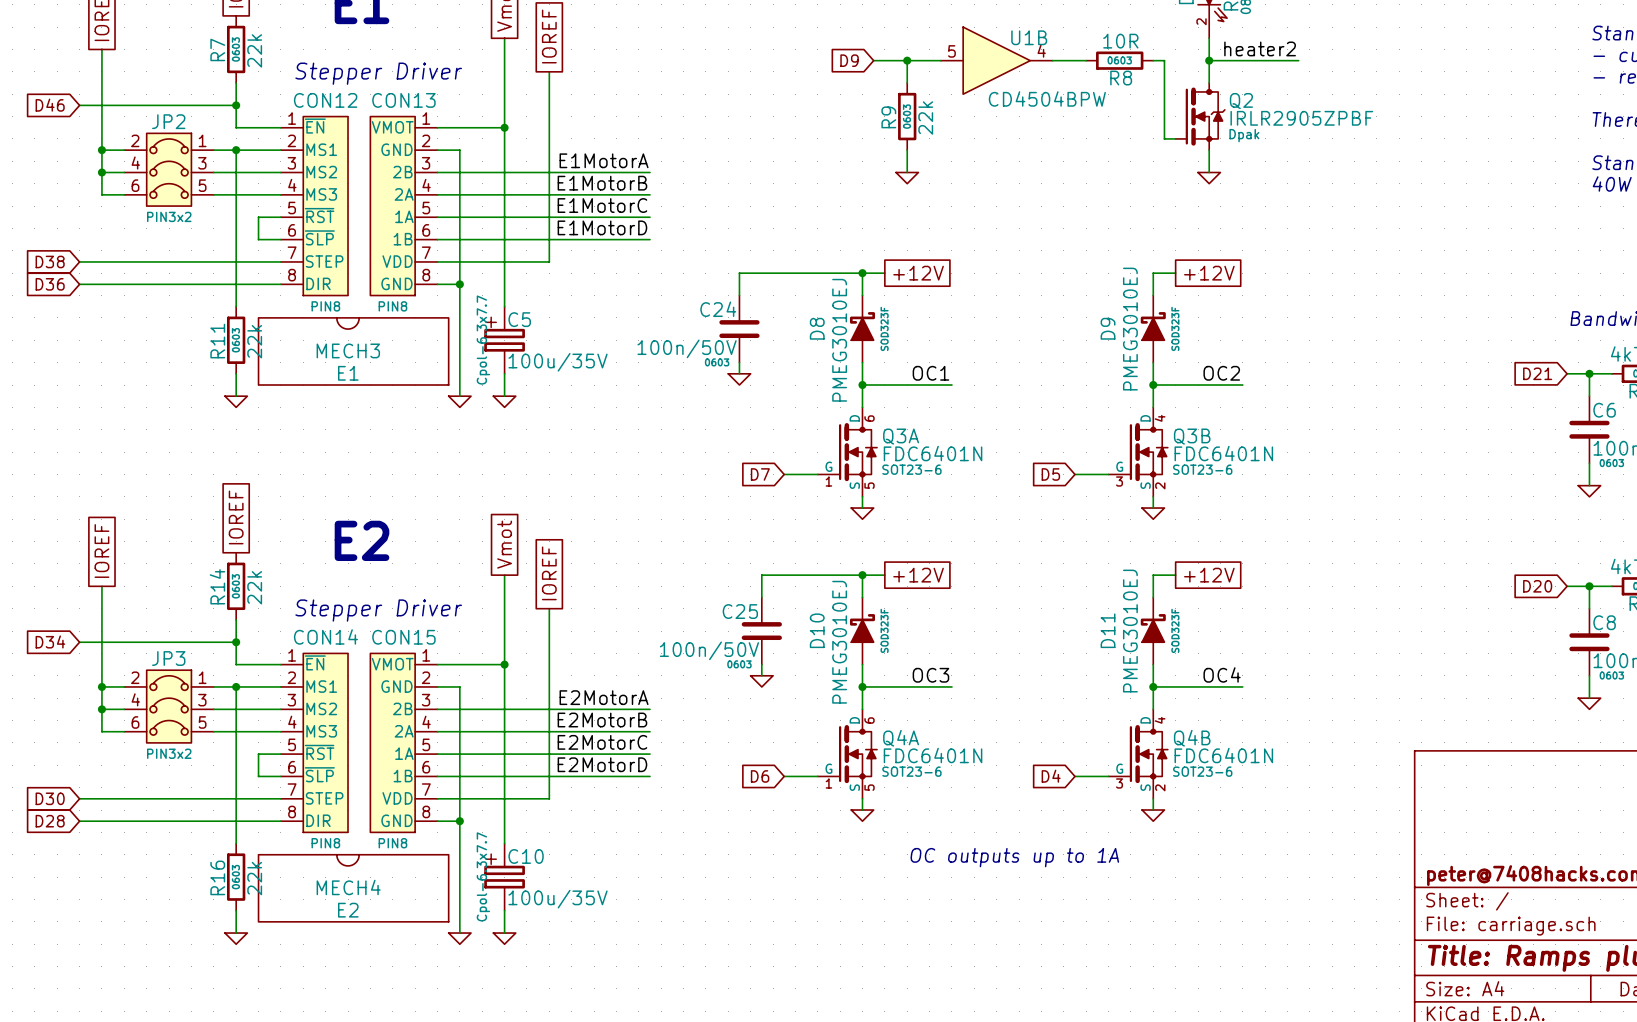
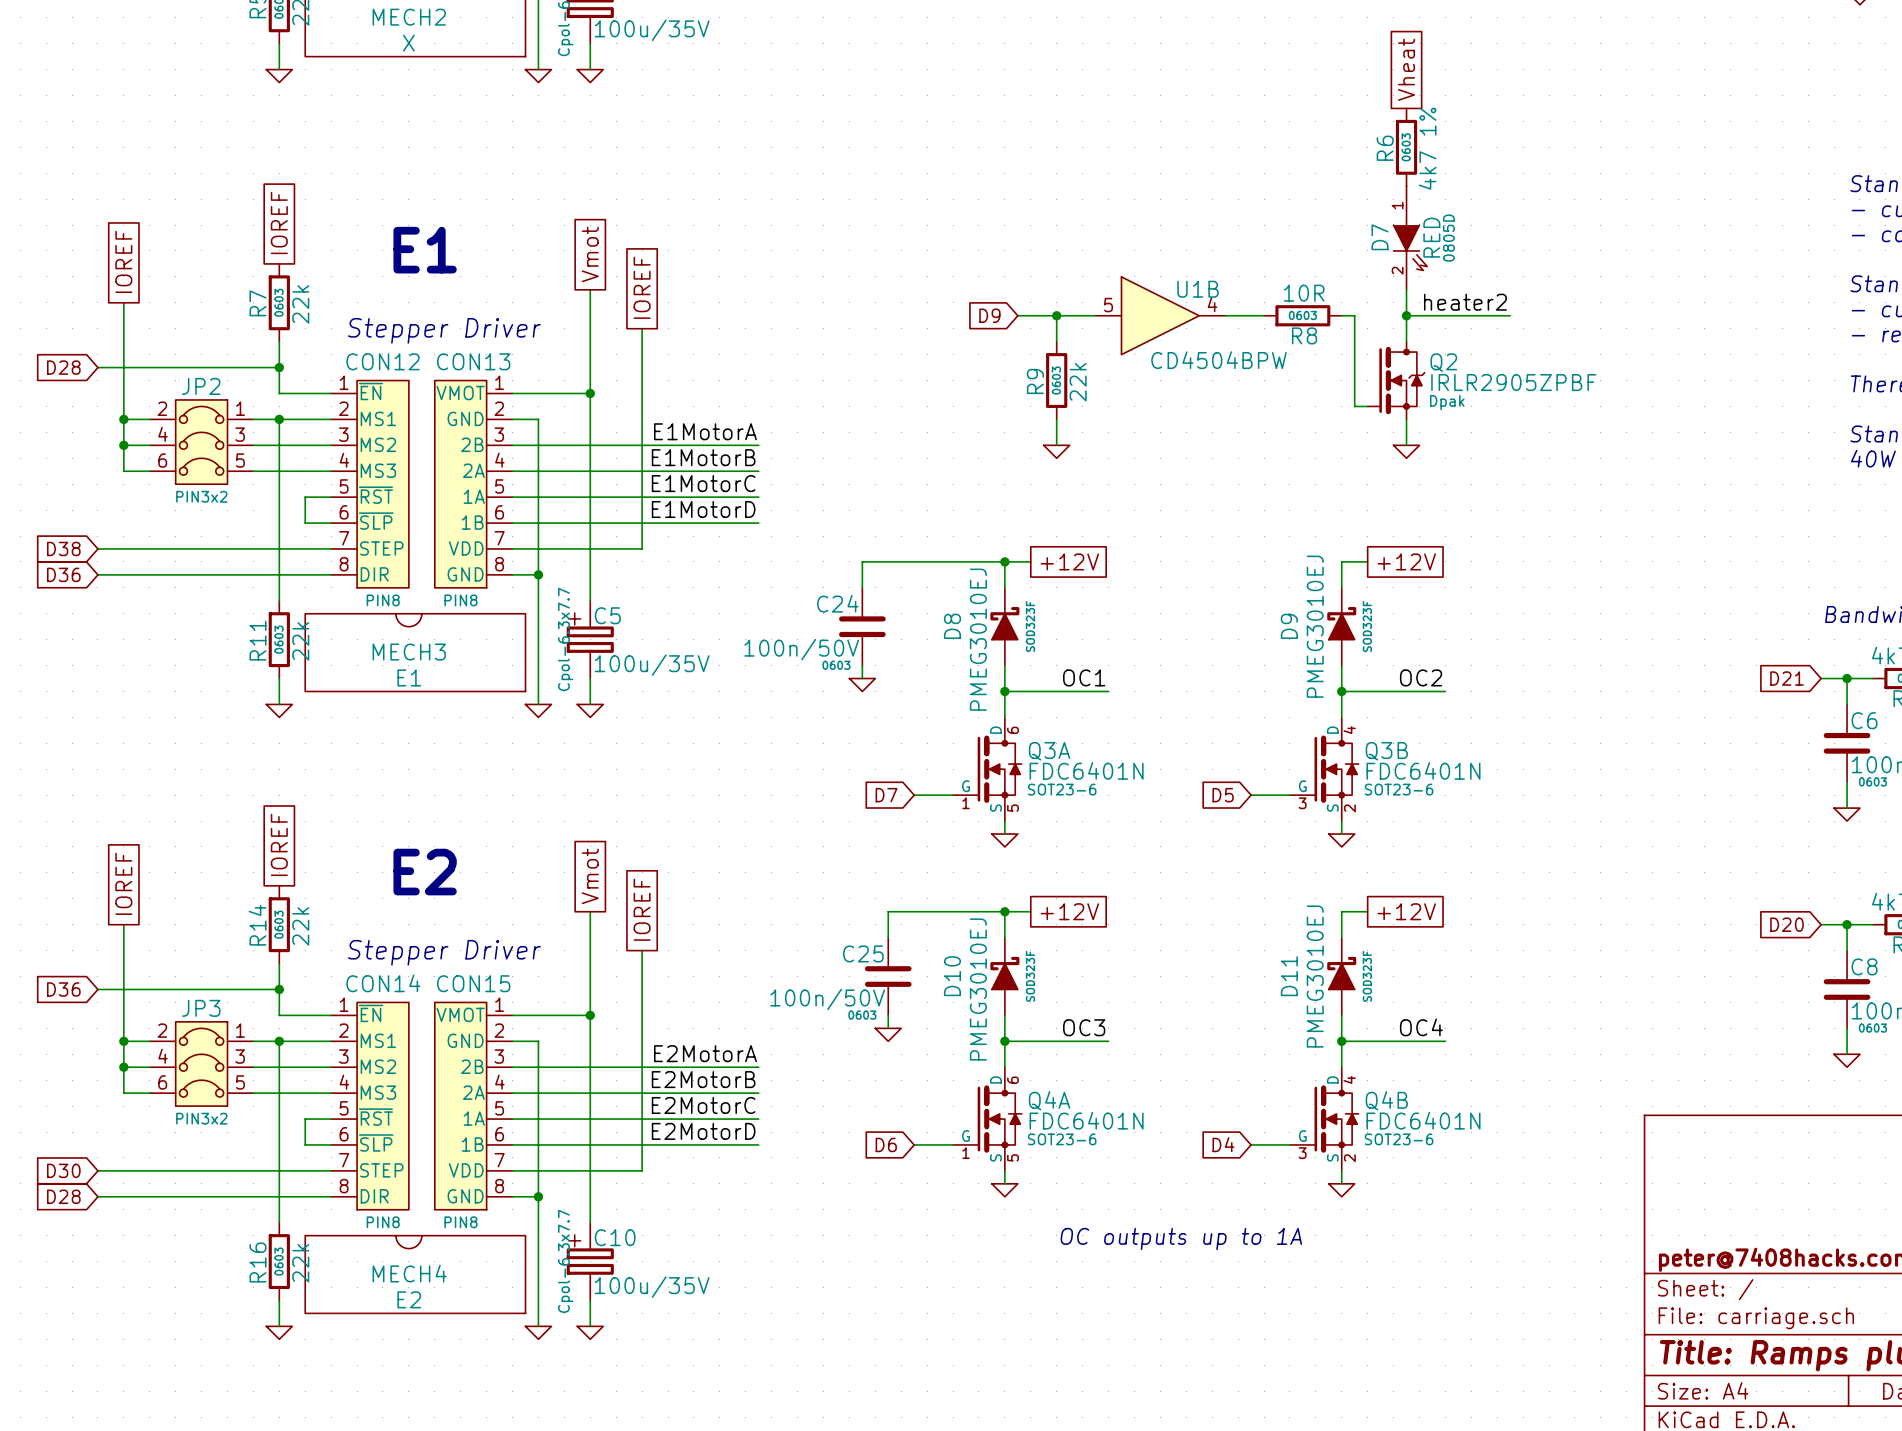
global label: D46 (50, 105) -> D28 (63, 367)
global label: D34 (50, 641) -> D36 (63, 989)

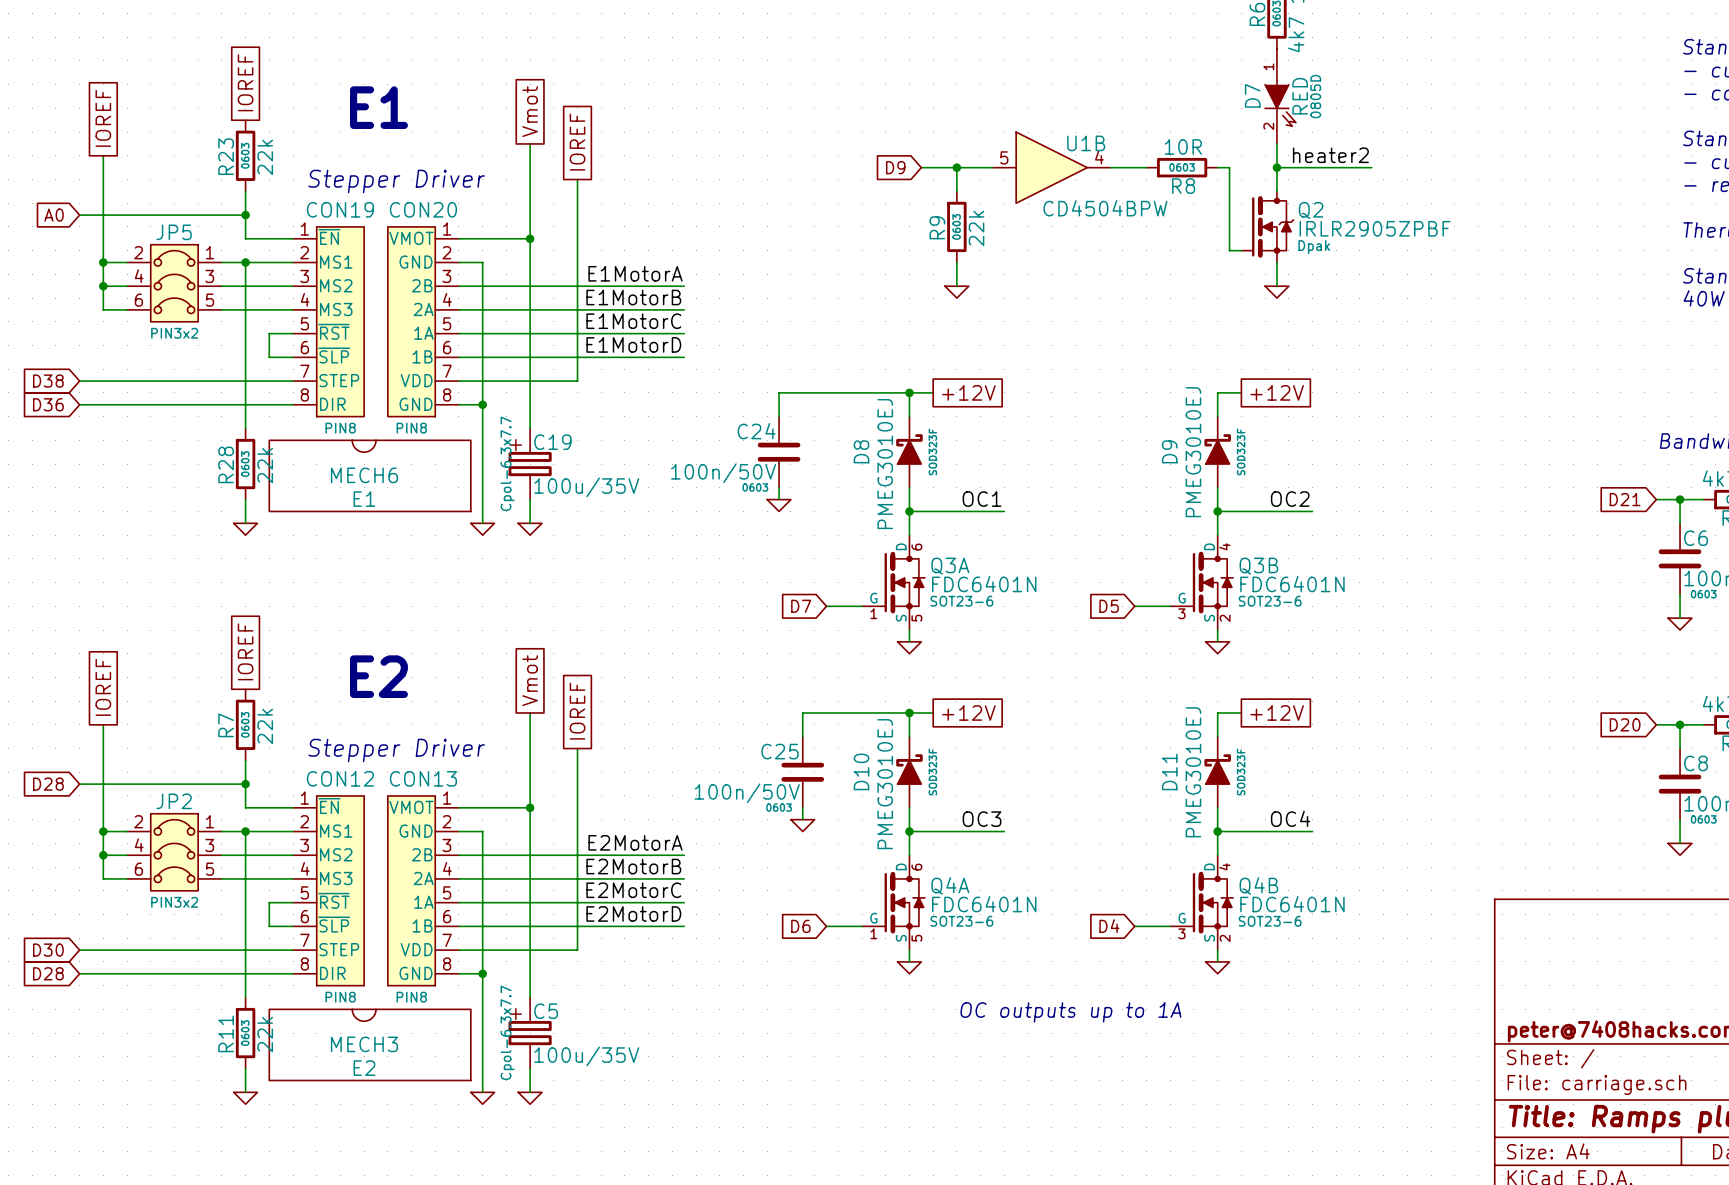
R7 name: R7 (258, 303) -> R23 (226, 156)
CON12 name: CON12 (382, 361) -> CON19 (340, 209)
CON13 name: CON13 (473, 361) -> CON20 (423, 209)
global label: D28 (63, 367) -> A0 (54, 215)
JP2 name: JP2 (201, 386) -> JP5 (174, 232)
C5 name: C5 (607, 615) -> C19 (552, 442)
R11 name: R11 (258, 640) -> R28 (226, 464)
MECH3 name: MECH3 (409, 652) -> MECH6 (364, 475)
R14 name: R14 (257, 925) -> R7 (226, 725)
CON14 name: CON14 (383, 983) -> CON12 (340, 778)
CON15 name: CON15 (473, 983) -> CON13 (423, 778)
global label: D36 (63, 989) -> D28 (48, 784)
JP3 name: JP3 (201, 1008) -> JP2 (174, 801)
C10 name: C10 (615, 1237) -> C5 (546, 1011)
R16 name: R16 (258, 1262) -> R11 (226, 1033)
MECH4 name: MECH4 (409, 1273) -> MECH3 (364, 1044)

